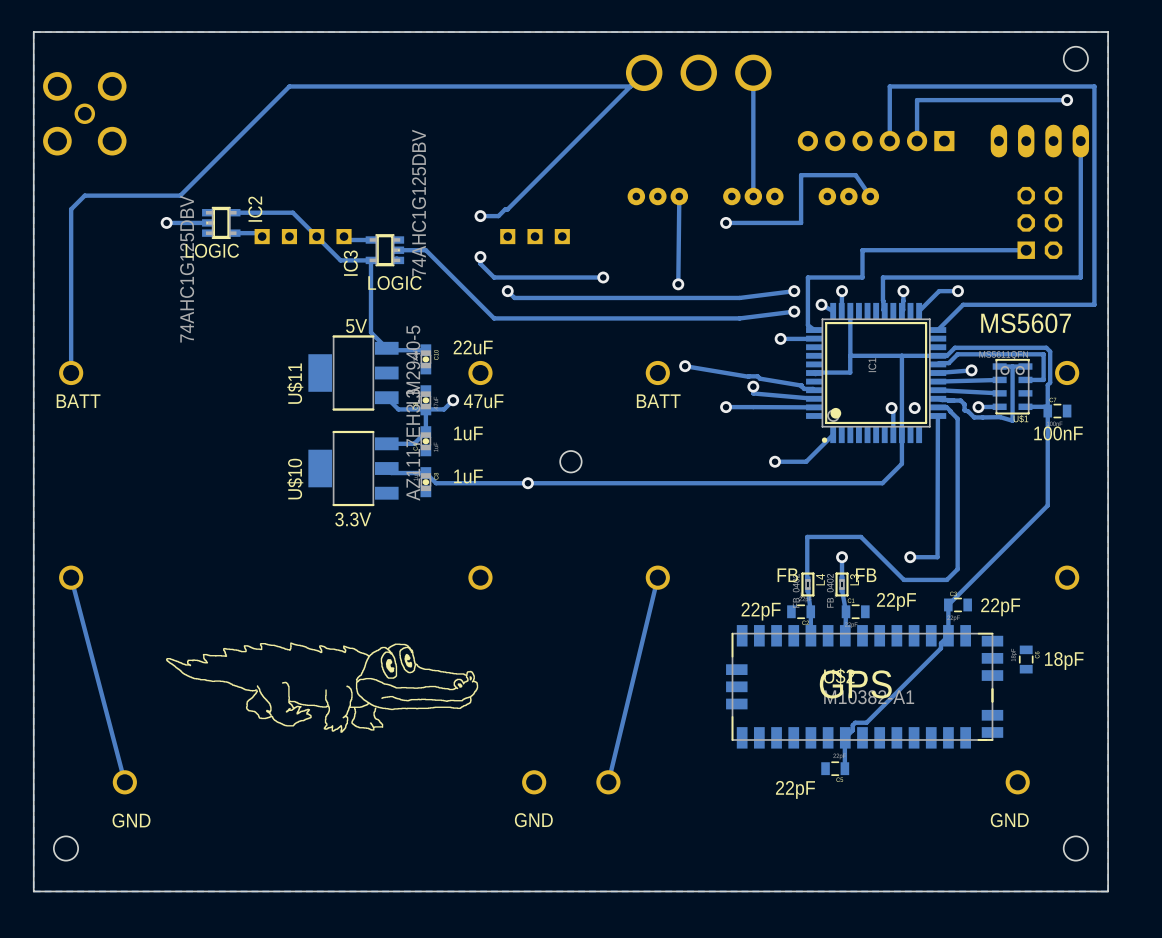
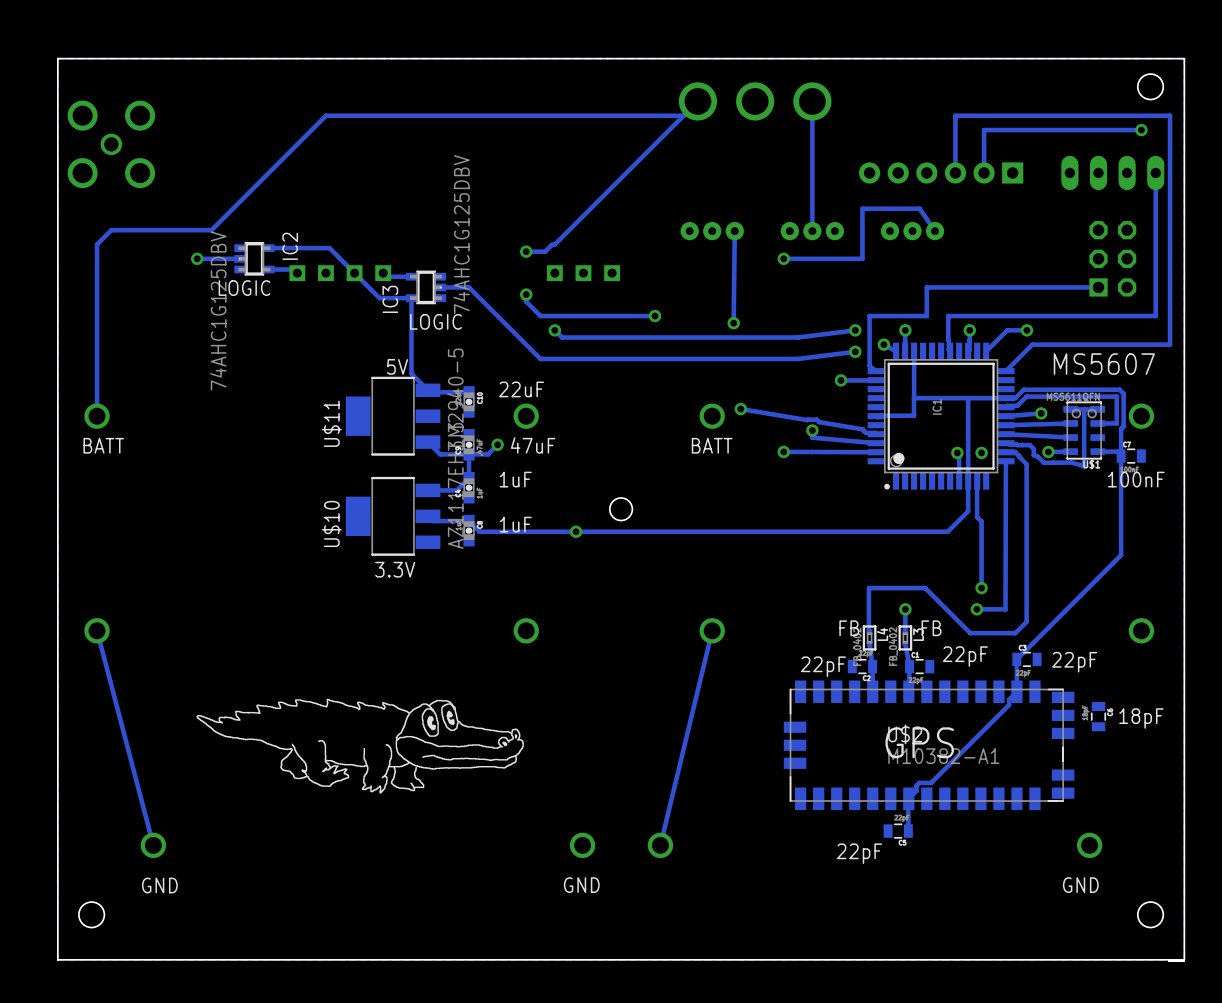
track: (833, 434) (806, 461) (775, 461) -> none
track: none -> (977, 481) (977, 517) (981, 521) (981, 588)
via: (775, 461) -> none
via: none -> (981, 588)

